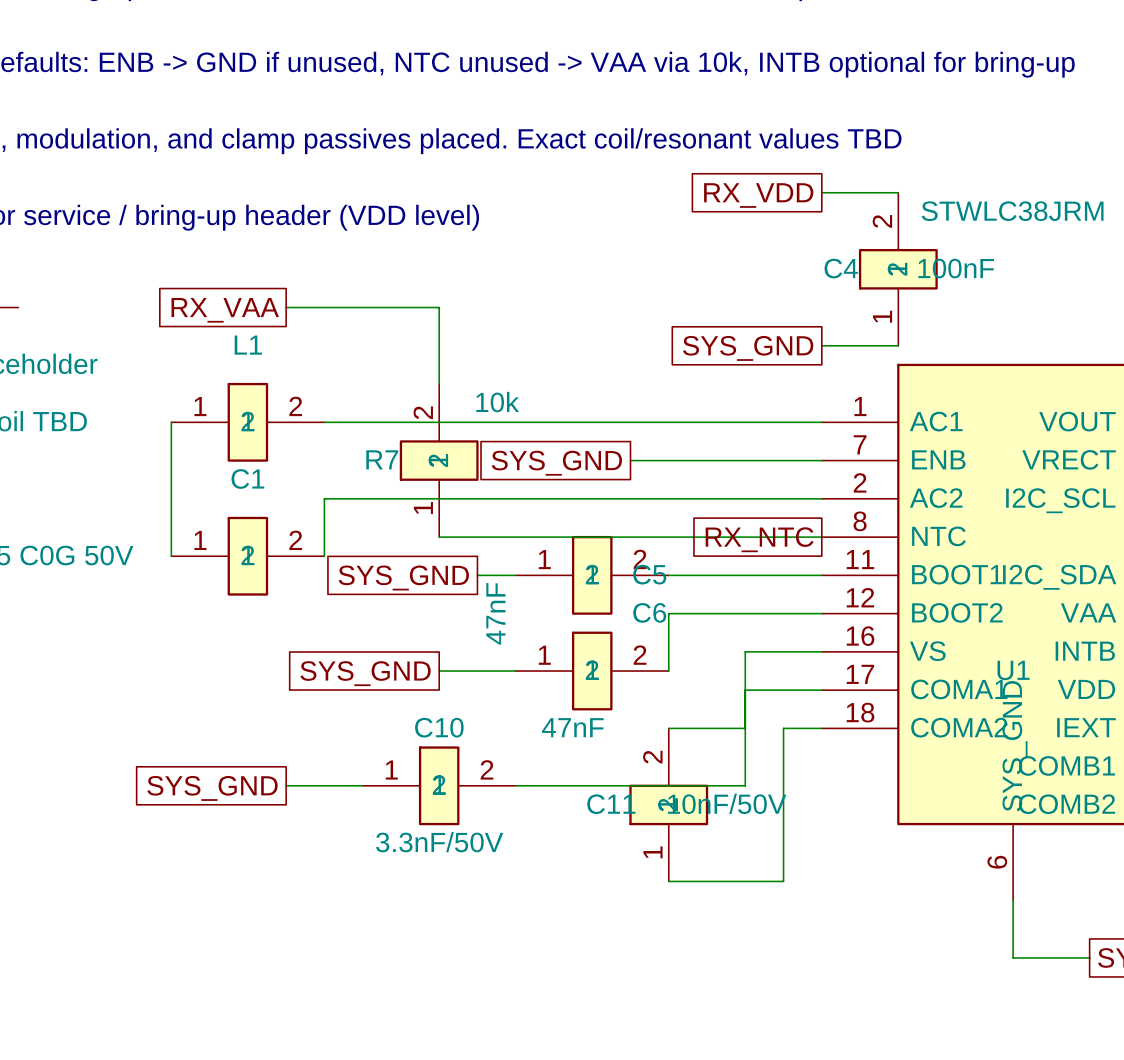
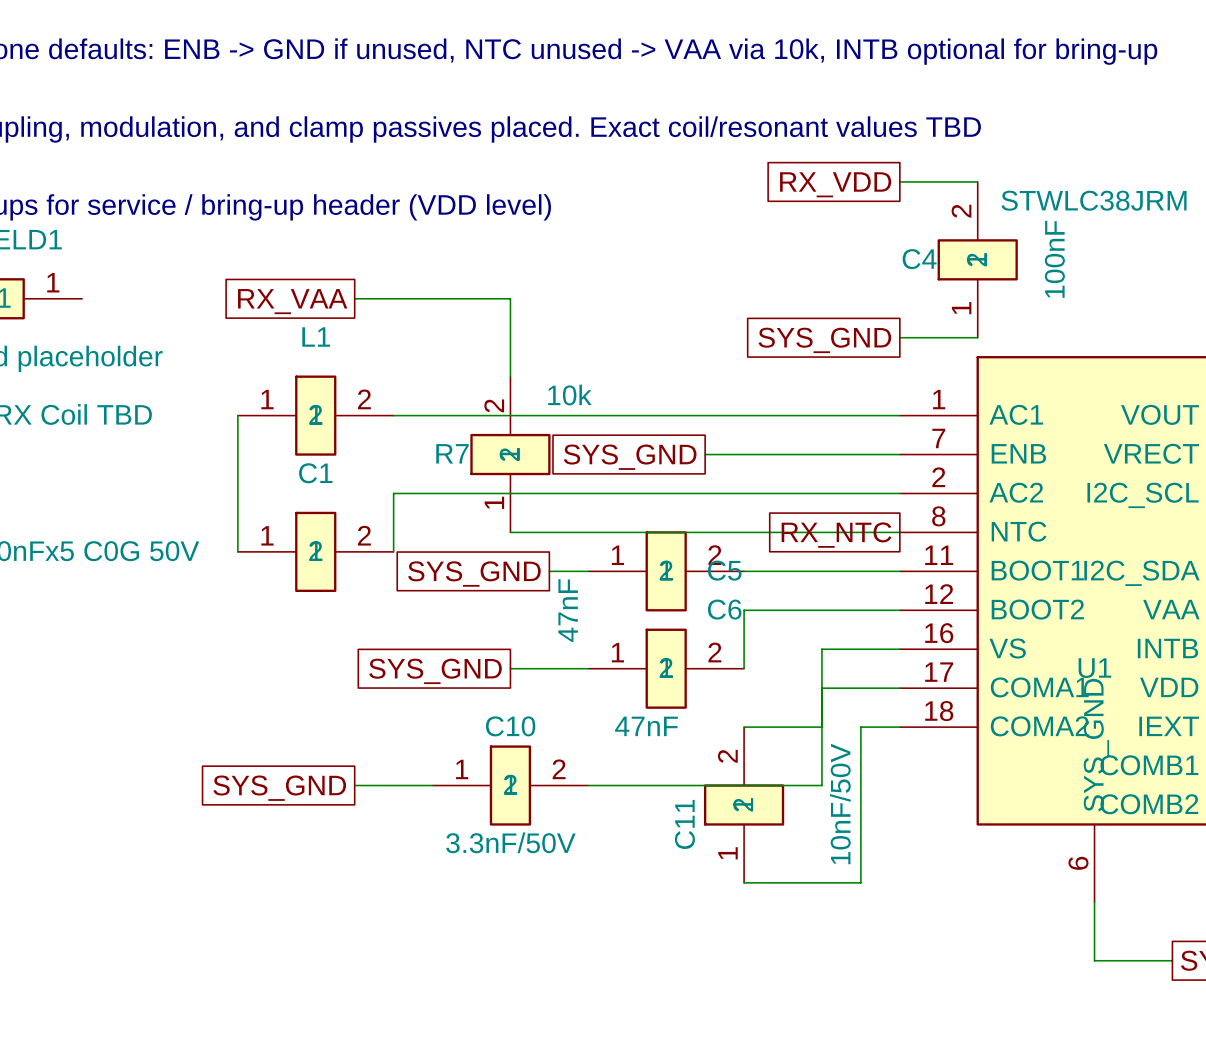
C4 value rotation: 0° (956, 268) -> 90° counterclockwise (1054, 259)
C11 value rotation: 0° (727, 803) -> 90° counterclockwise (840, 803)
C11 name rotation: 0° (611, 804) -> 90° counterclockwise (684, 824)

